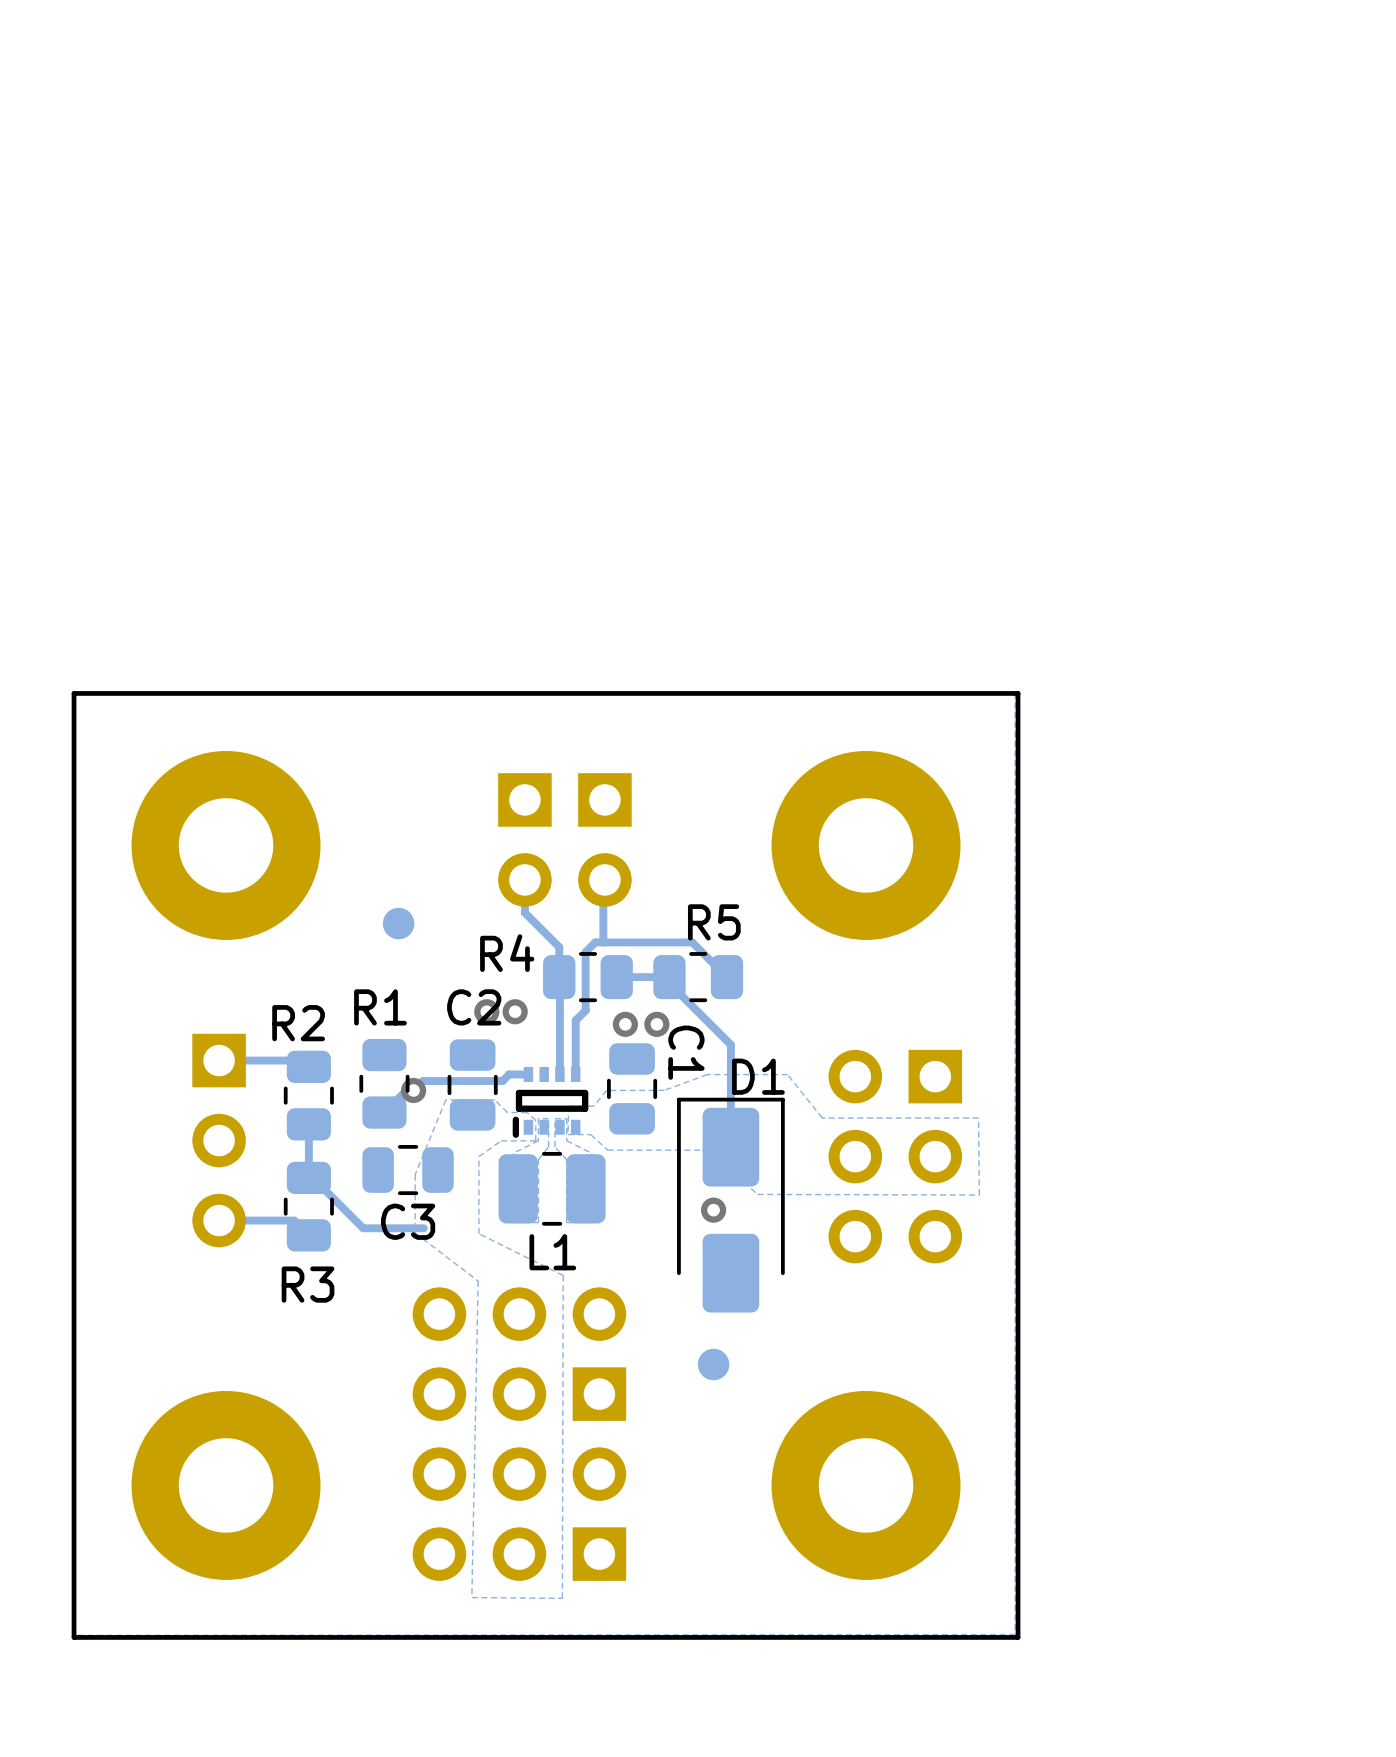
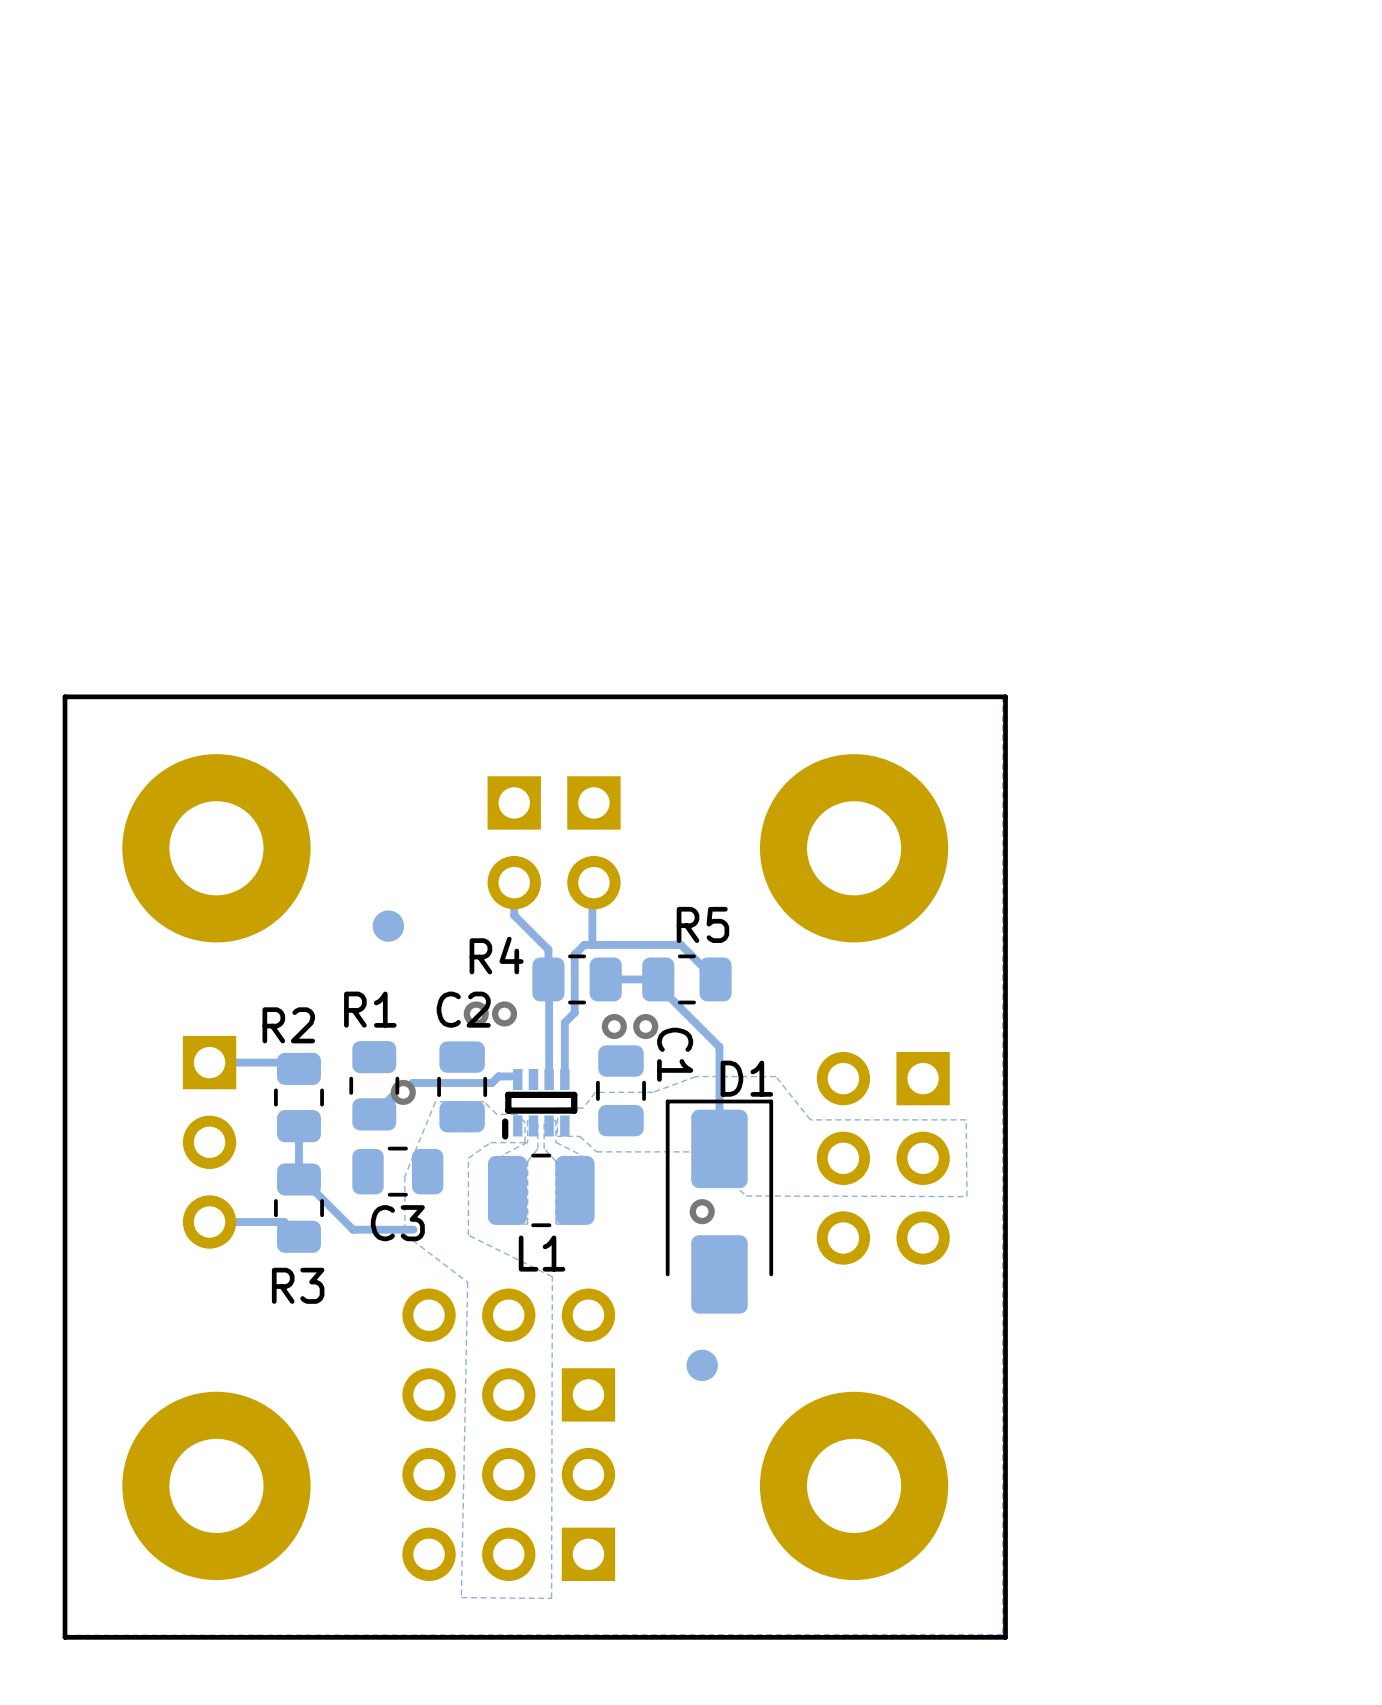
part footprint: [512, 1066, 589, 1138] -> [502, 1069, 578, 1140]

